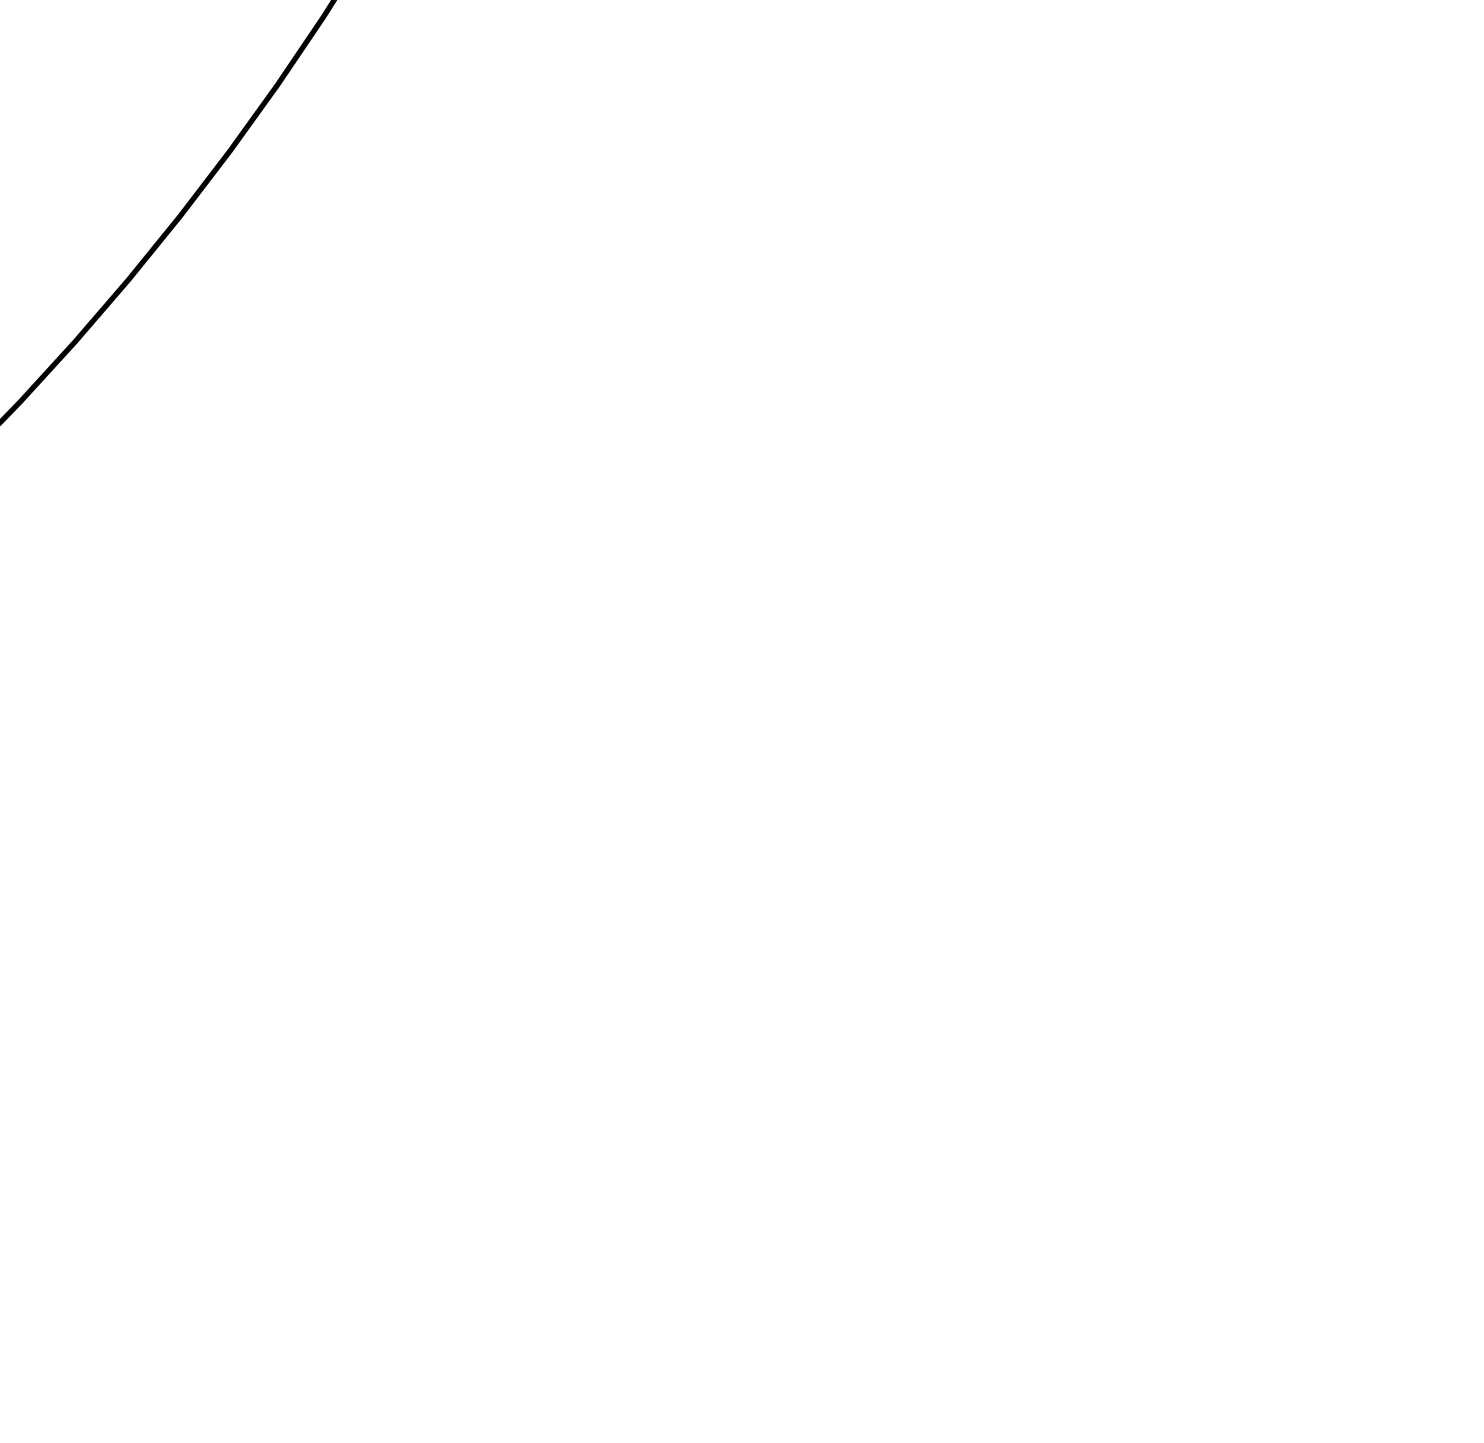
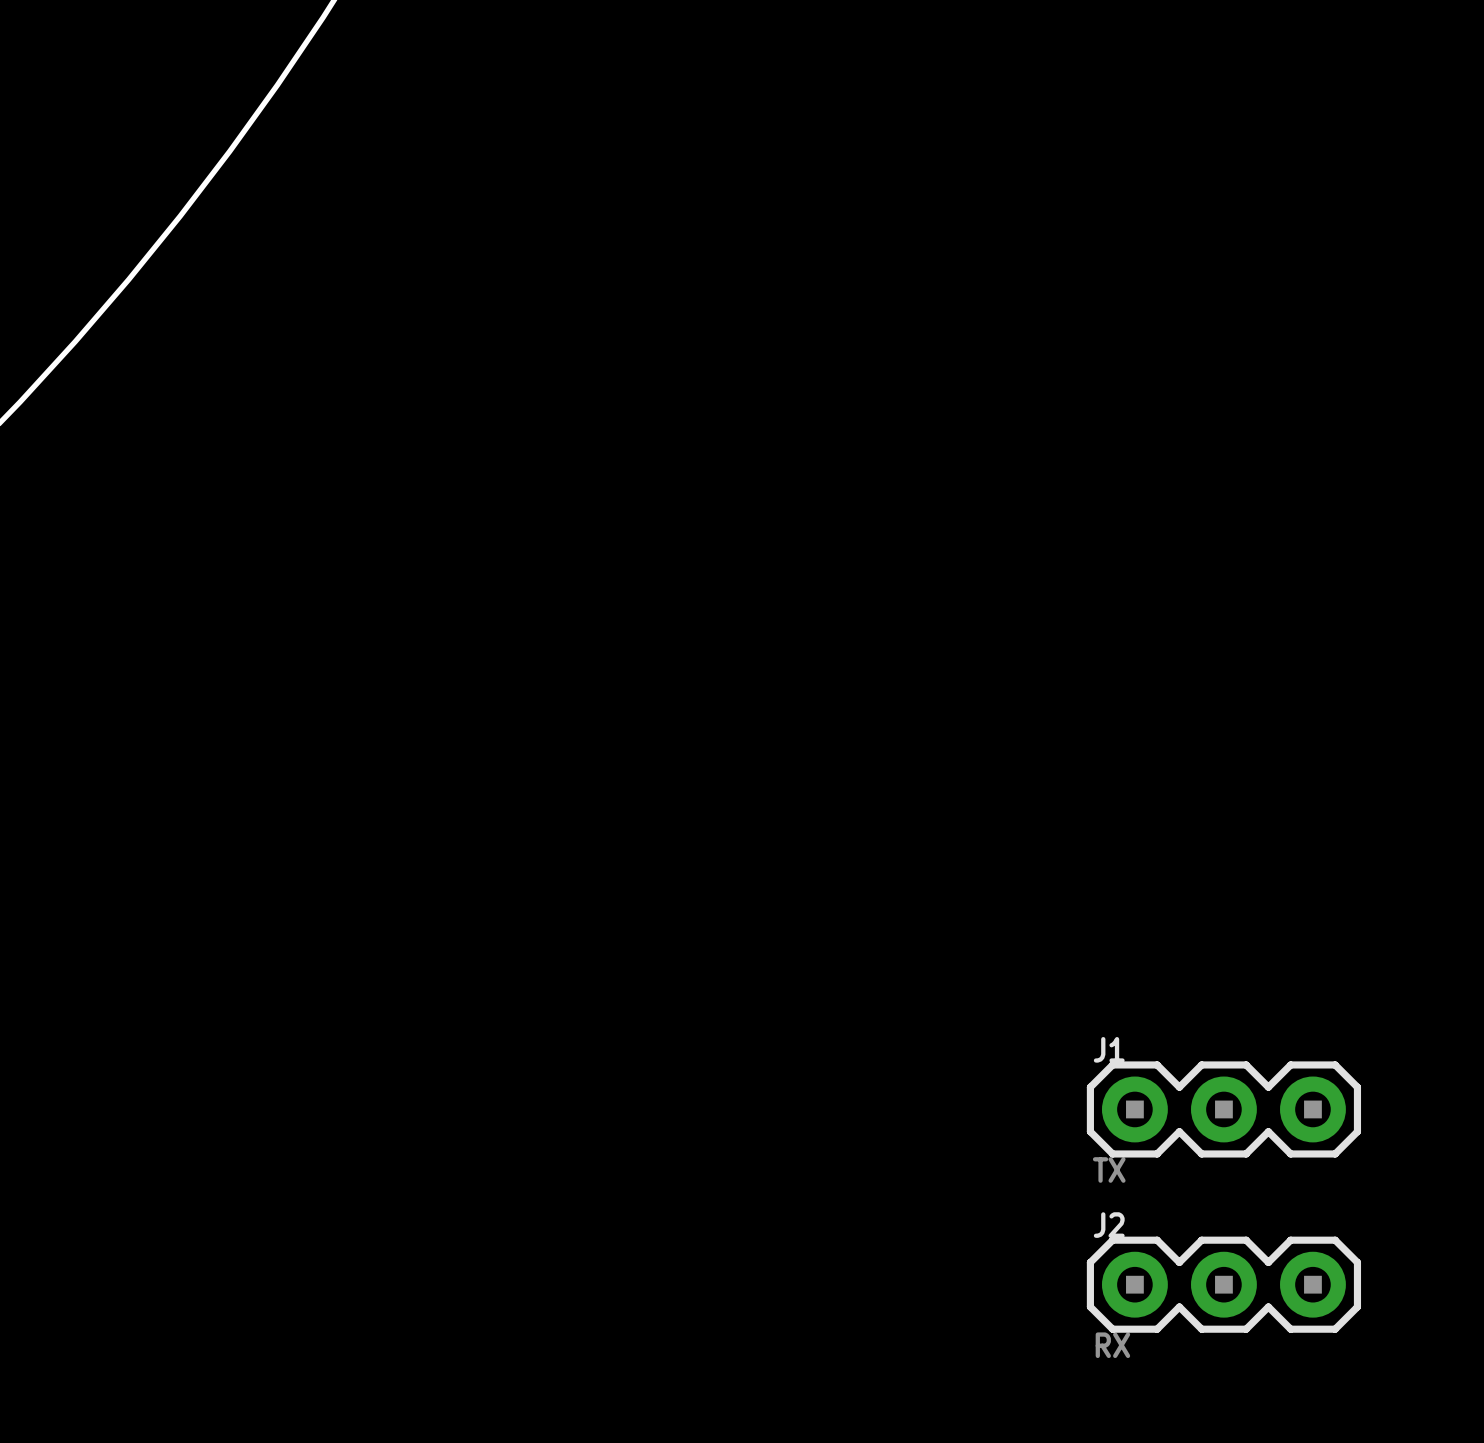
J1: none -> TX (1223, 1109)
J2: none -> RX (1223, 1284)

